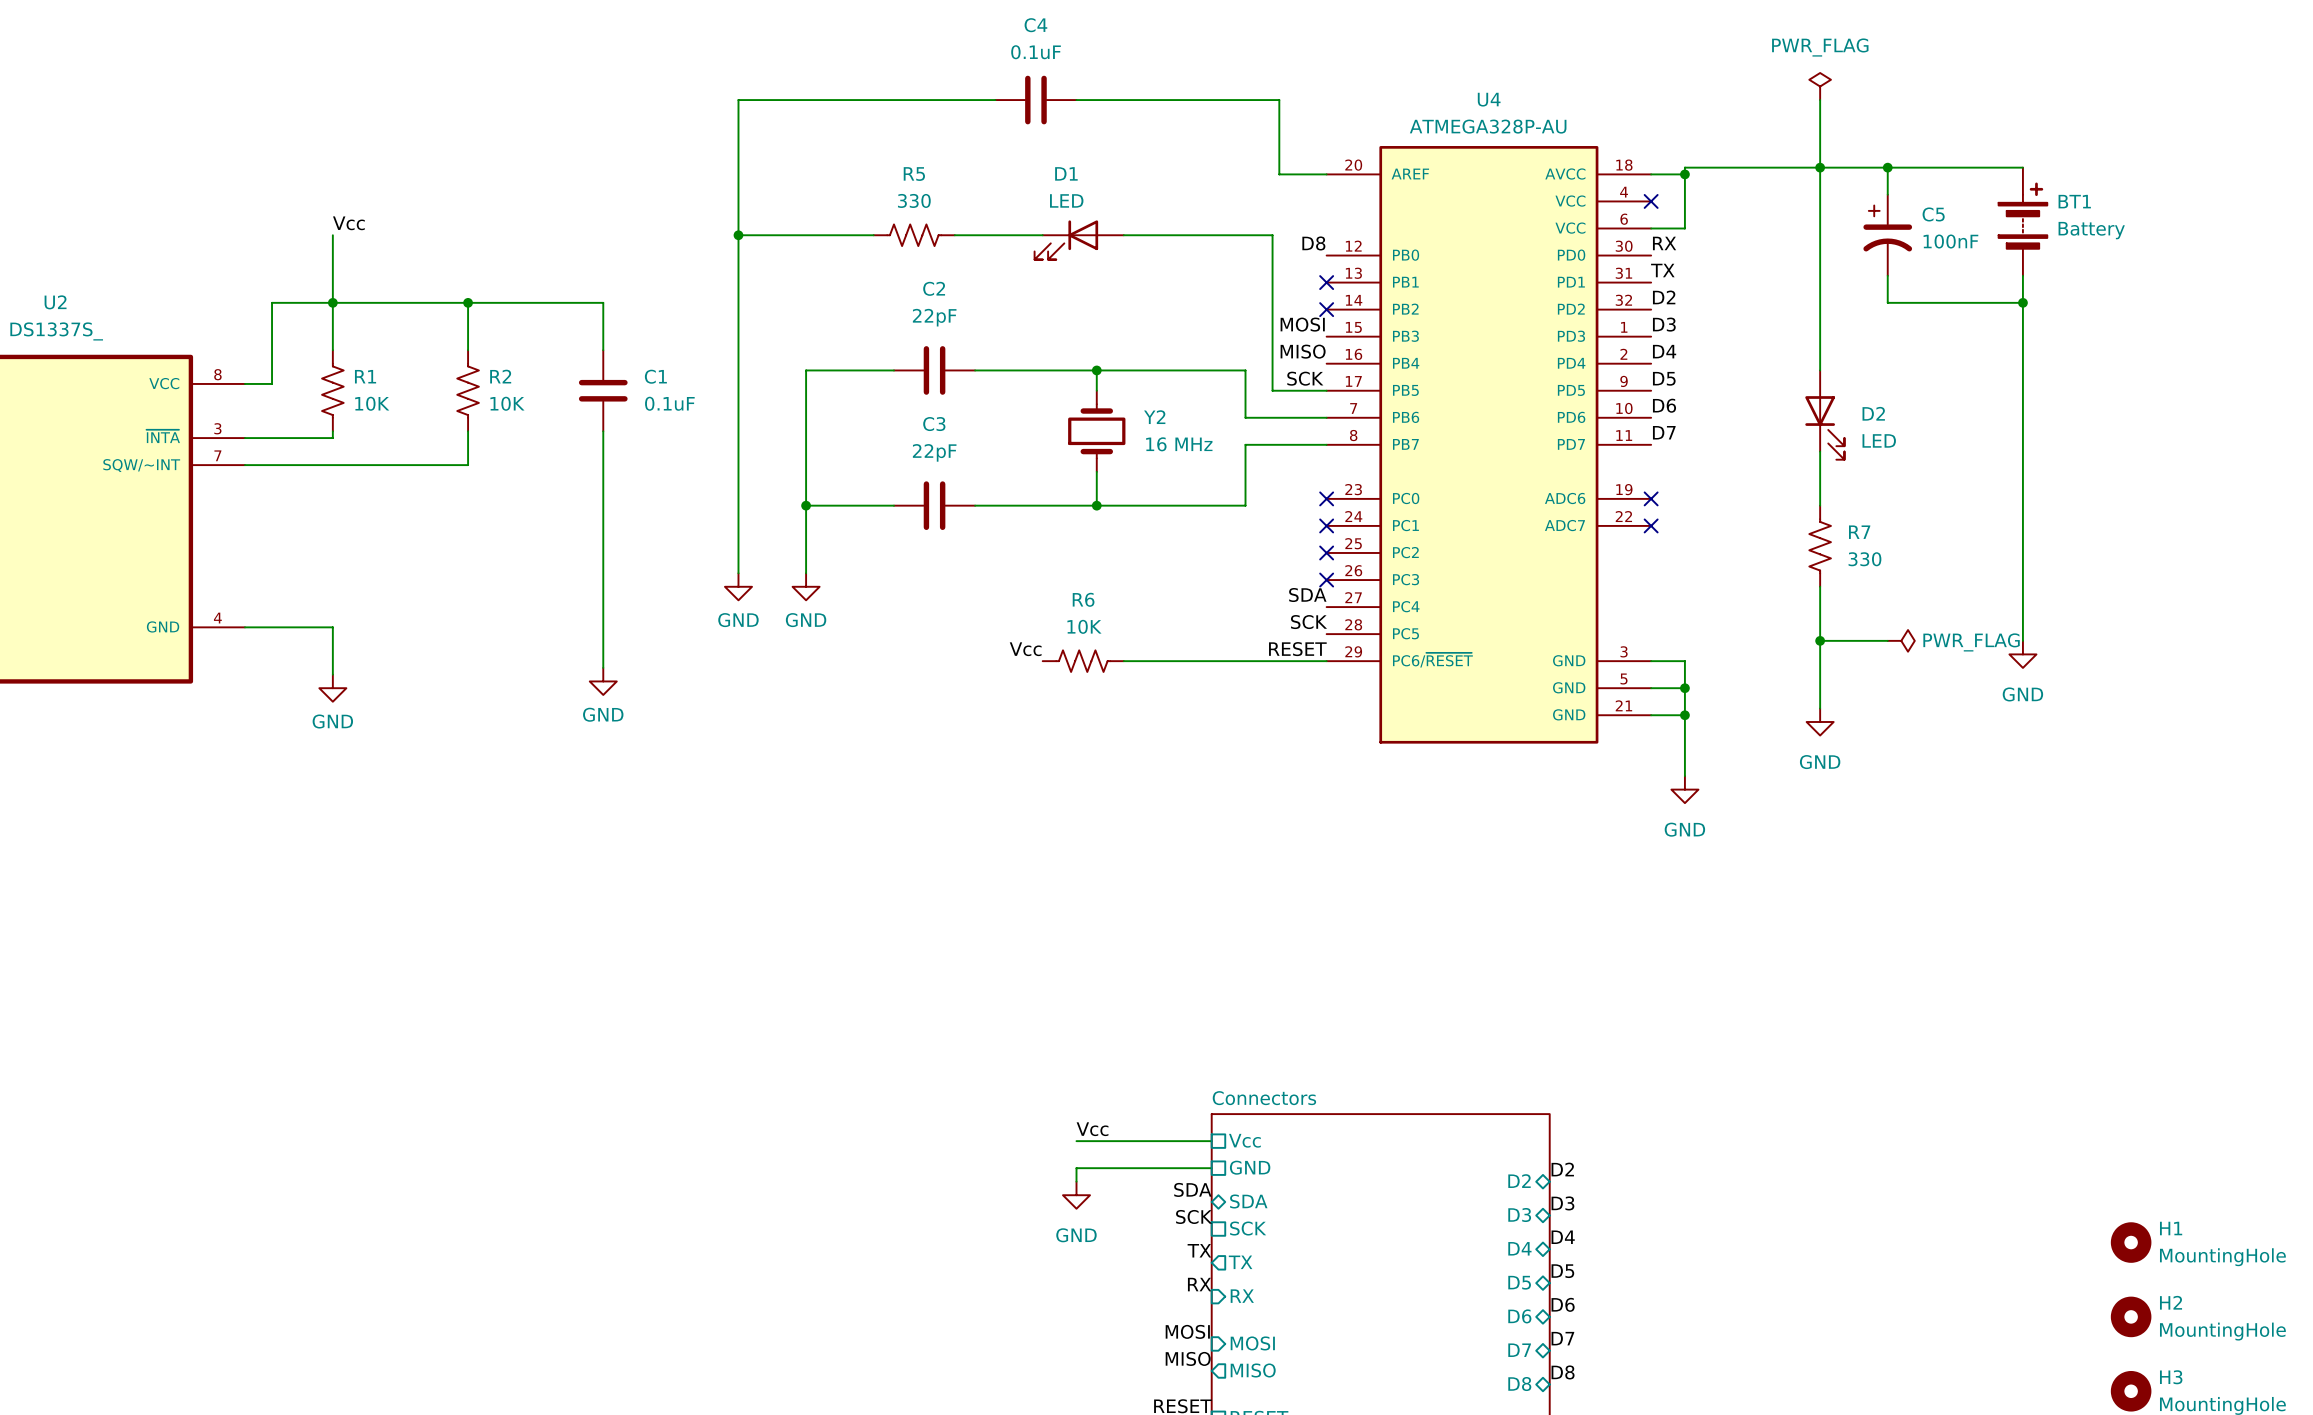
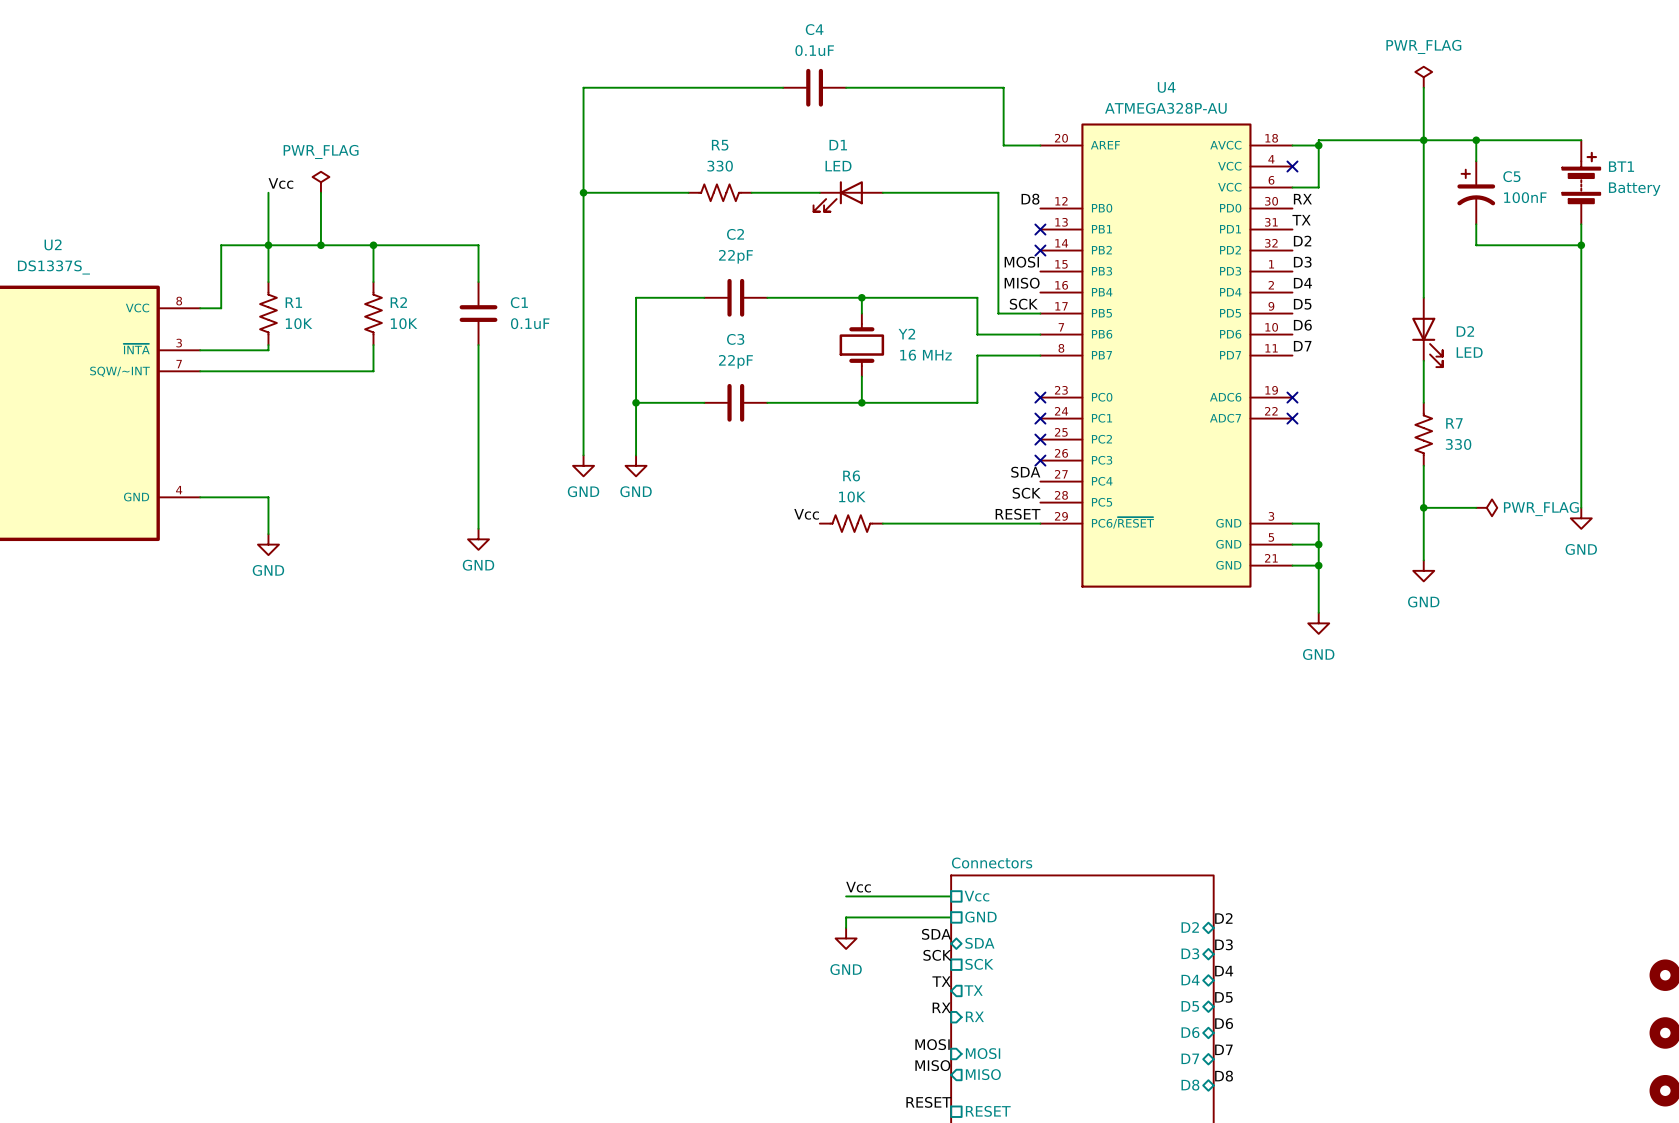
power symbol: none -> PWR_FLAG (320, 182)
wire: none -> (320, 192) (320, 245)
junction: none -> (320, 245)

